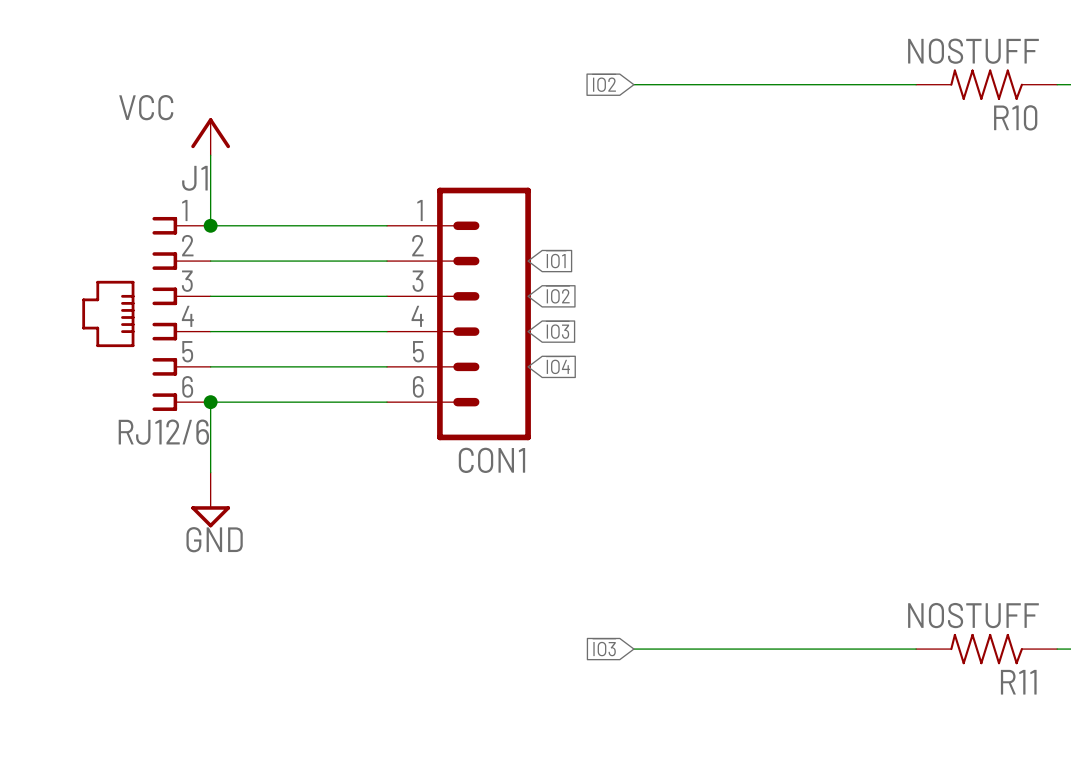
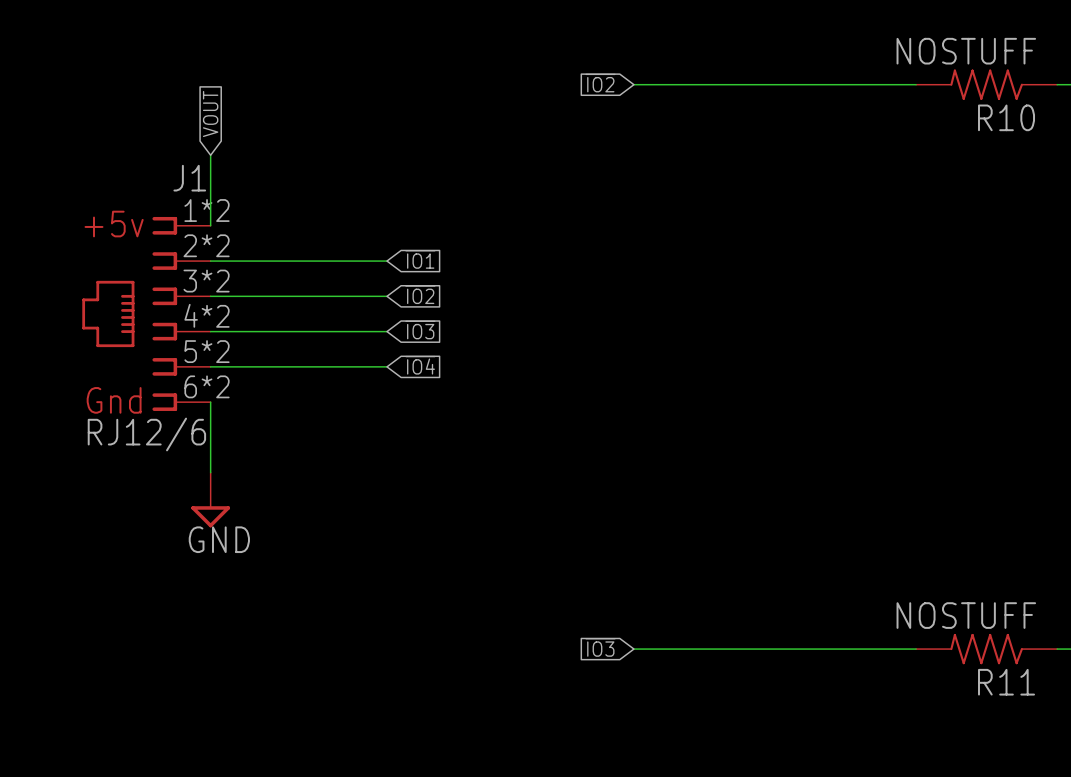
global label: none -> VOUT (210, 113)
power symbol: VCC (210, 136) -> none
J1 pin number: 1 (184, 210) -> 1*2 (207, 210)
J1 text: none -> +5v (114, 224)
wire: (210, 225) (387, 225) -> none
junction: (210, 225) -> none
J1 pin number: 2 (187, 245) -> 2*2 (206, 245)
global label position: ~{IO1} (556, 259) -> ~{IO1} (420, 259)
J1 pin number: 3 (187, 281) -> 3*2 (206, 281)
global label position: ~{IO2} (557, 294) -> ~{IO2} (420, 294)
CON1: (458, 313) -> none
J1 pin number: 4 (187, 316) -> 4*2 (207, 315)
global label position: ~{IO3} (557, 330) -> ~{IO3} (420, 329)
J1 pin number: 5 (187, 351) -> 5*2 (207, 351)
global label position: ~{IO4} (558, 365) -> ~{IO4} (420, 365)
J1 pin number: 6 (187, 386) -> 6*2 (207, 386)
J1 text: none -> Gnd (114, 400)
wire: (210, 402) (387, 402) -> none
junction: (210, 402) -> none

